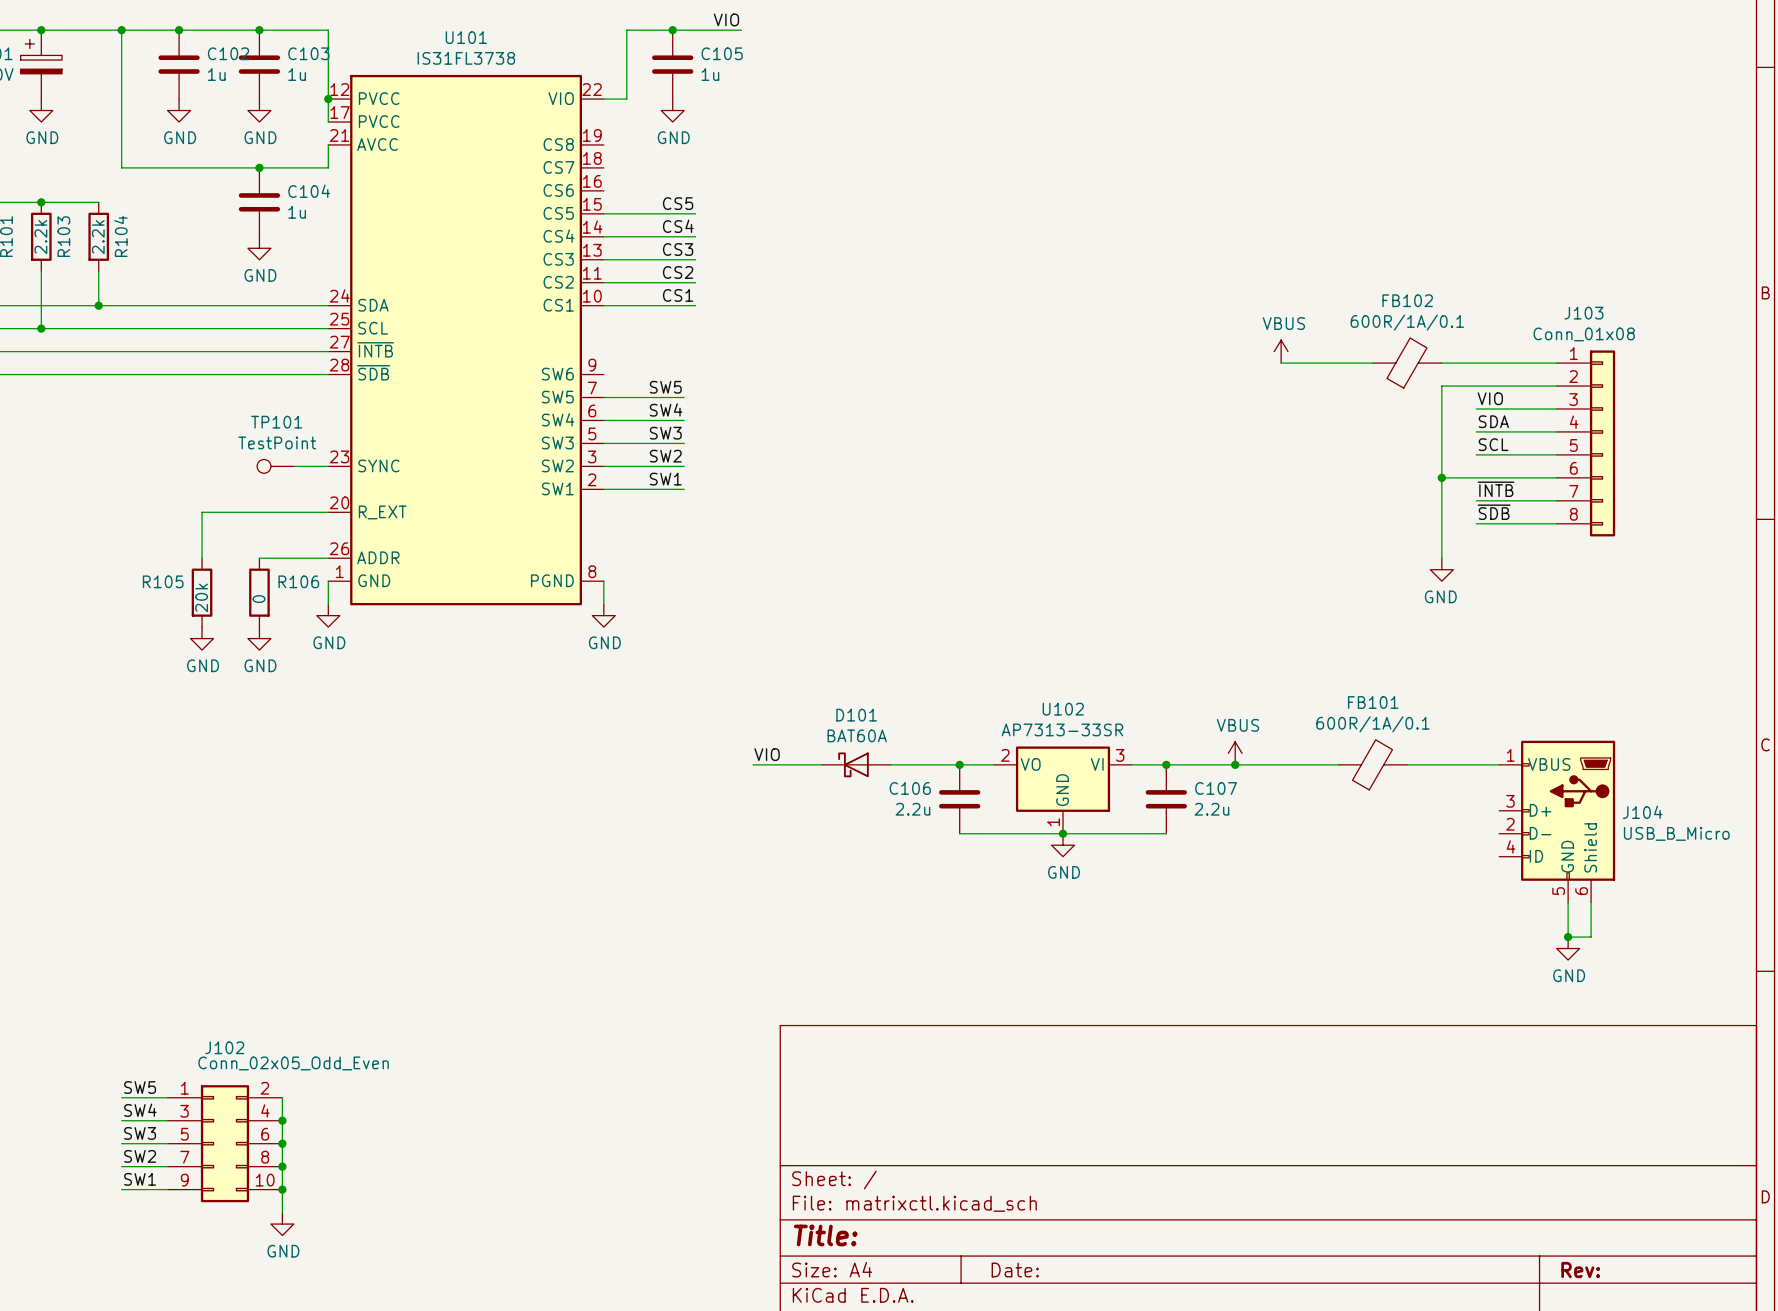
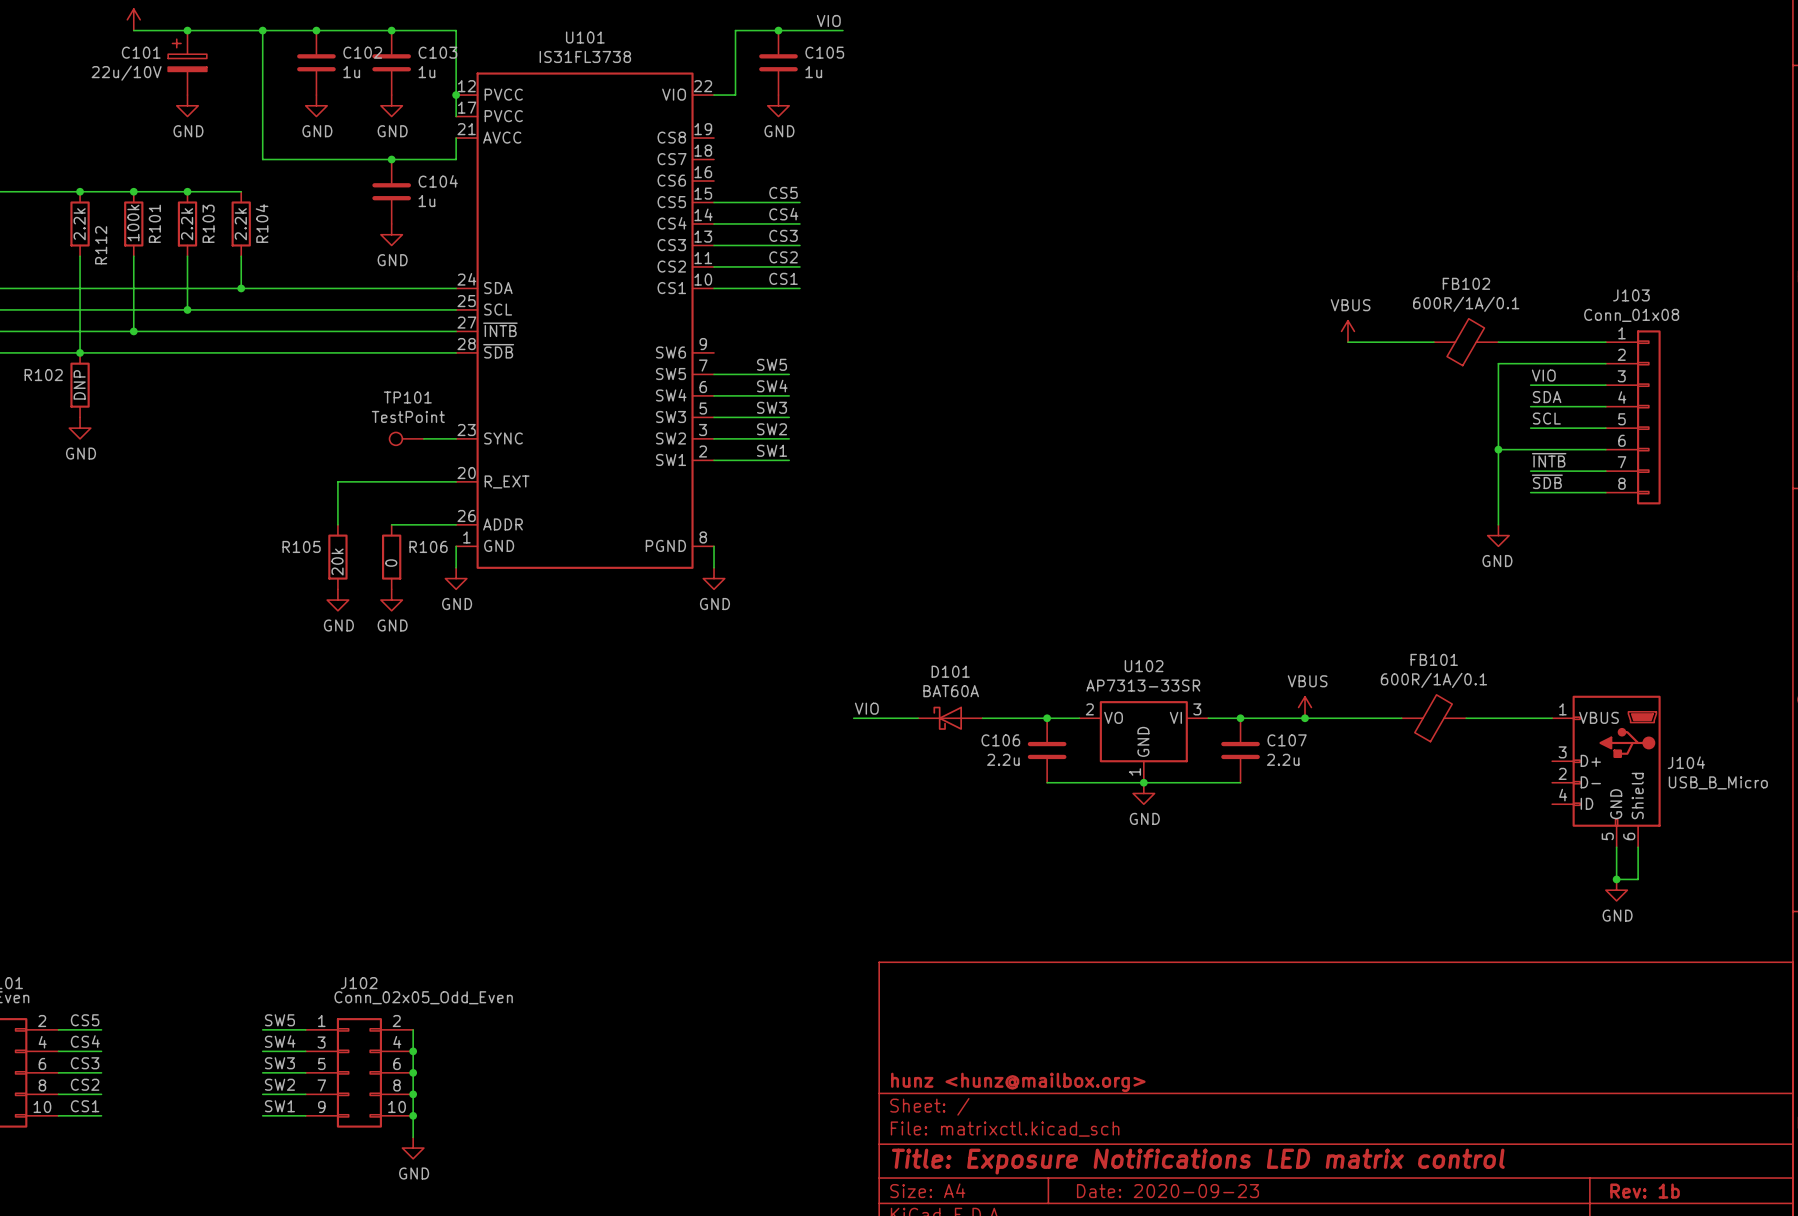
title block: none -> hunz <hunz@mailbox.org> (1018, 1082)
title block: Title: (825, 1235) -> Title: Exposure Notifications LED matrix control (1198, 1161)
title block: Date: (1015, 1270) -> Date: 2020-09-23 (1167, 1191)
title block: Rev: (1580, 1270) -> Rev: 1b (1645, 1191)

